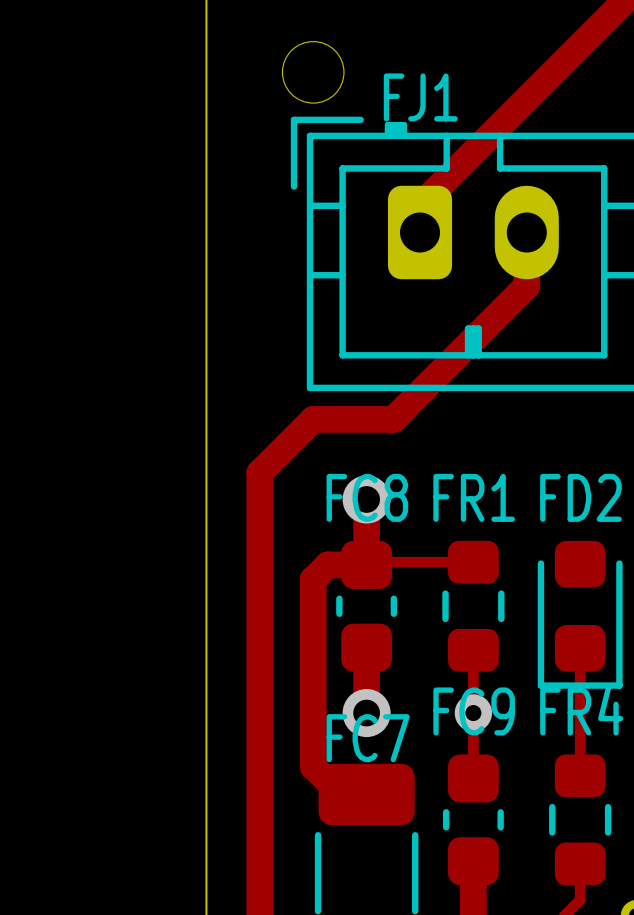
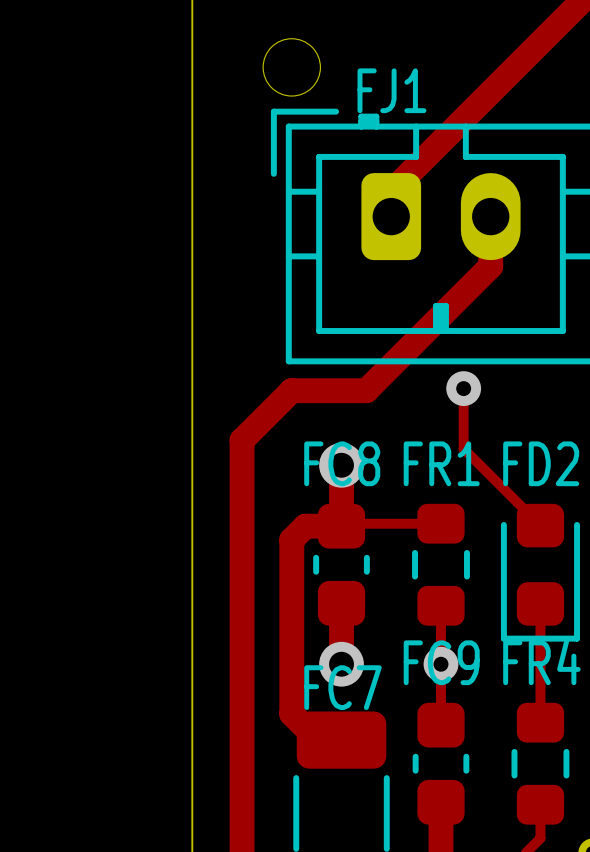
track: none -> (463, 388) (463, 448) (540, 525)
via: none -> (463, 388)

